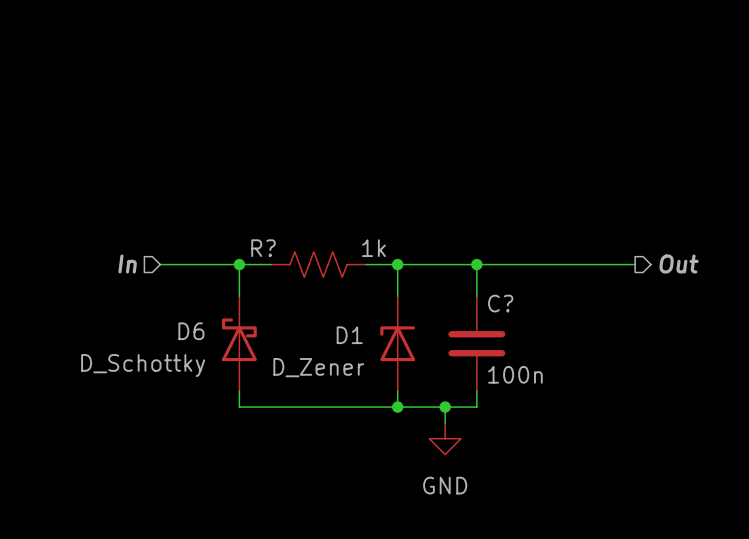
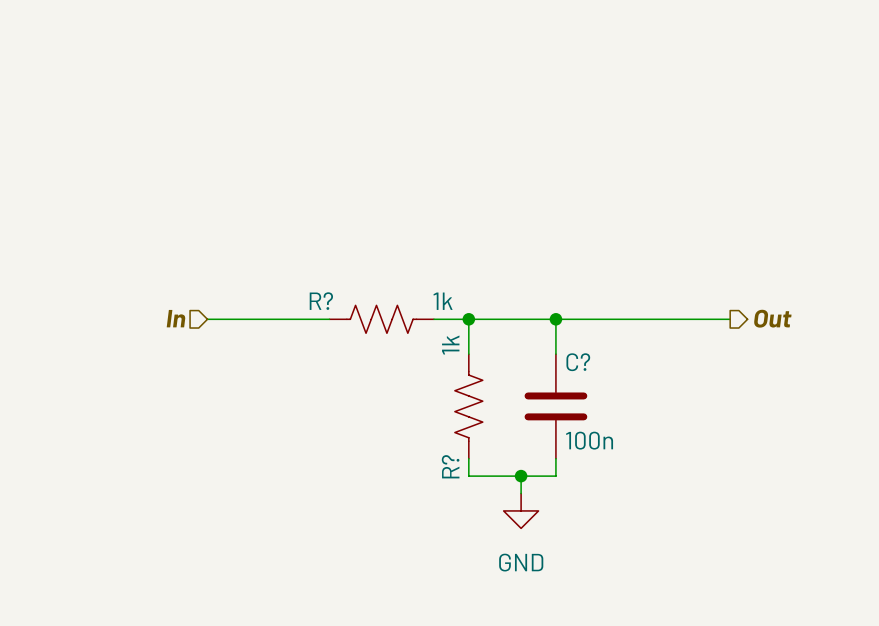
wire: (239, 264) (239, 296) -> none
junction: (239, 264) -> none
D6: D_Schottky (239, 343) -> none
D1: D_Zener (397, 343) -> none
R?: none -> 1k (468, 406)
wire: (239, 391) (239, 407) (397, 407) -> none
junction: (397, 407) -> none

